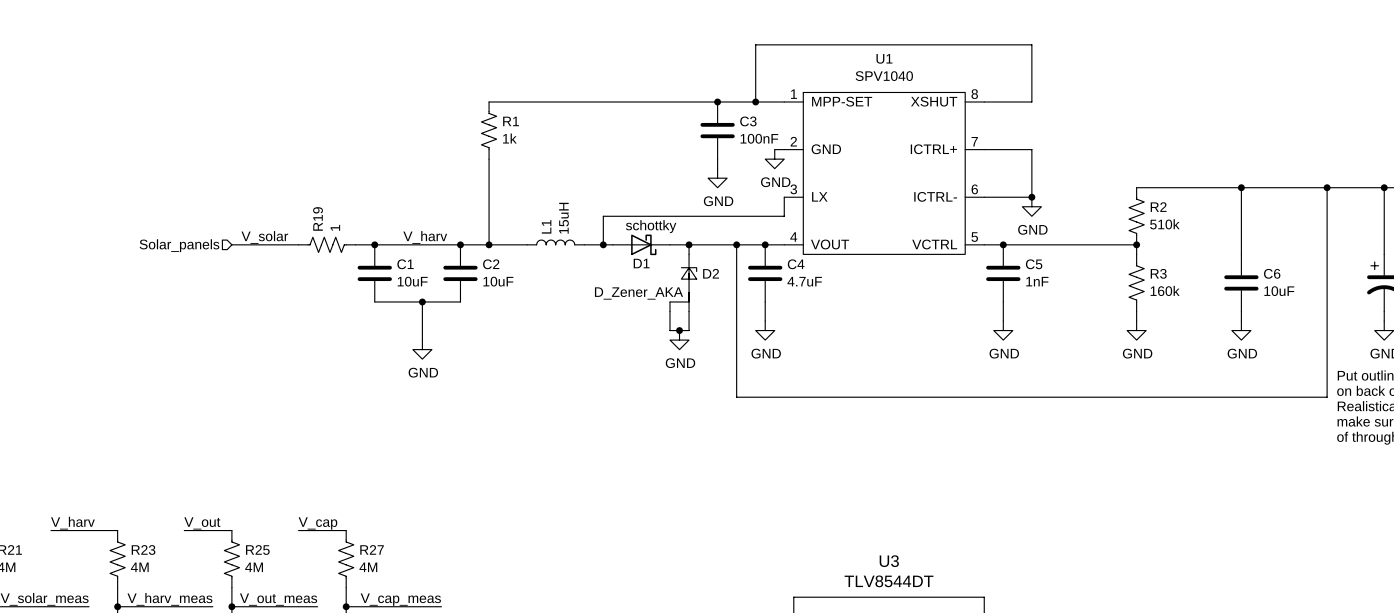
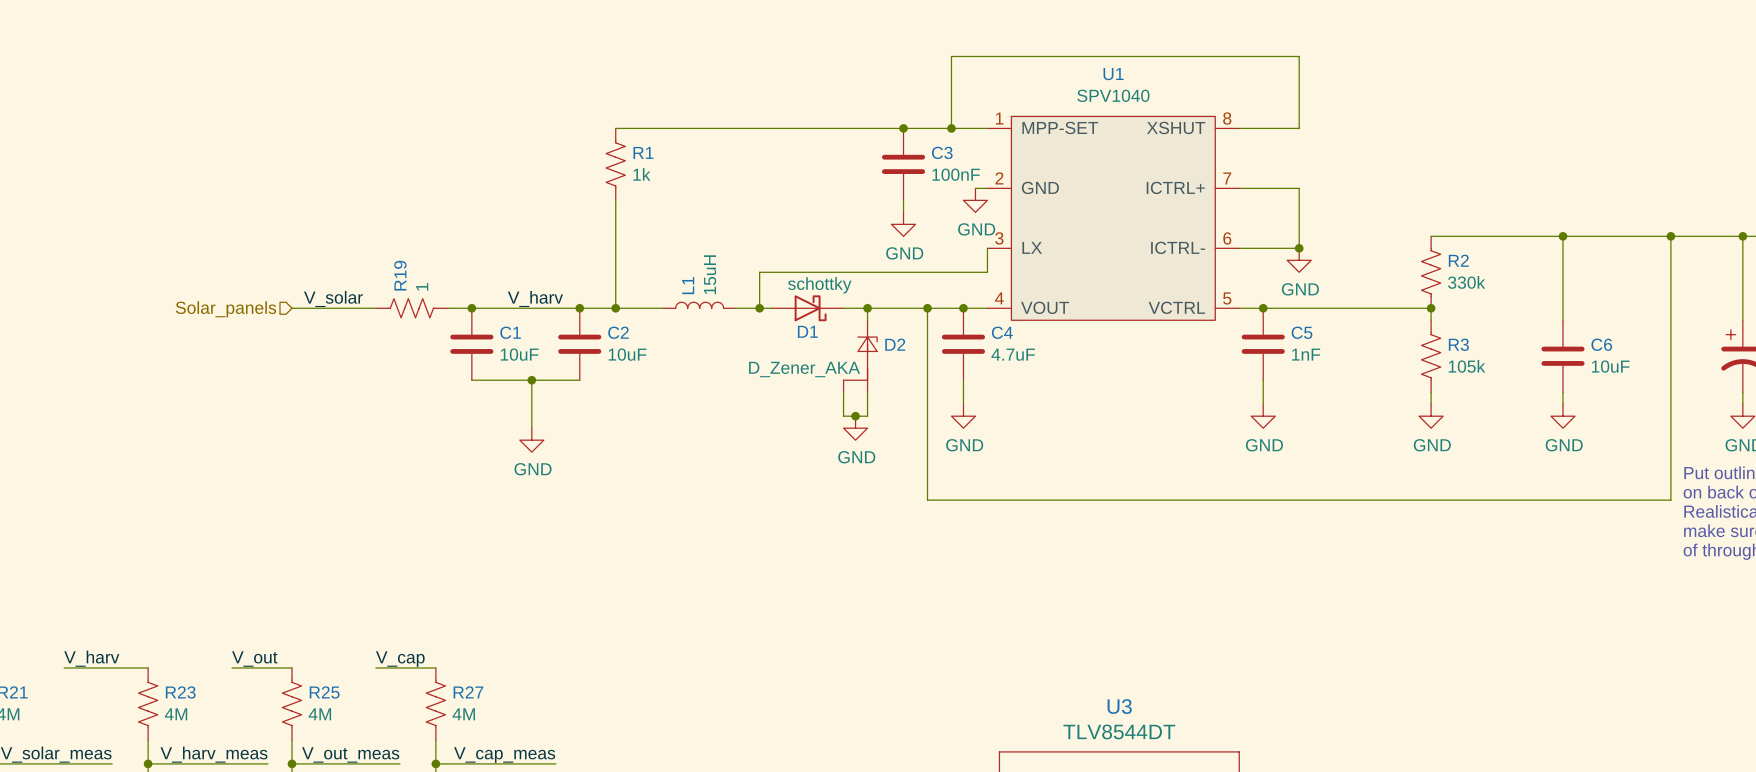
R2 value: 510k (1164, 224) -> 330k (1466, 282)
R3 value: 160k (1165, 290) -> 105k (1466, 366)

